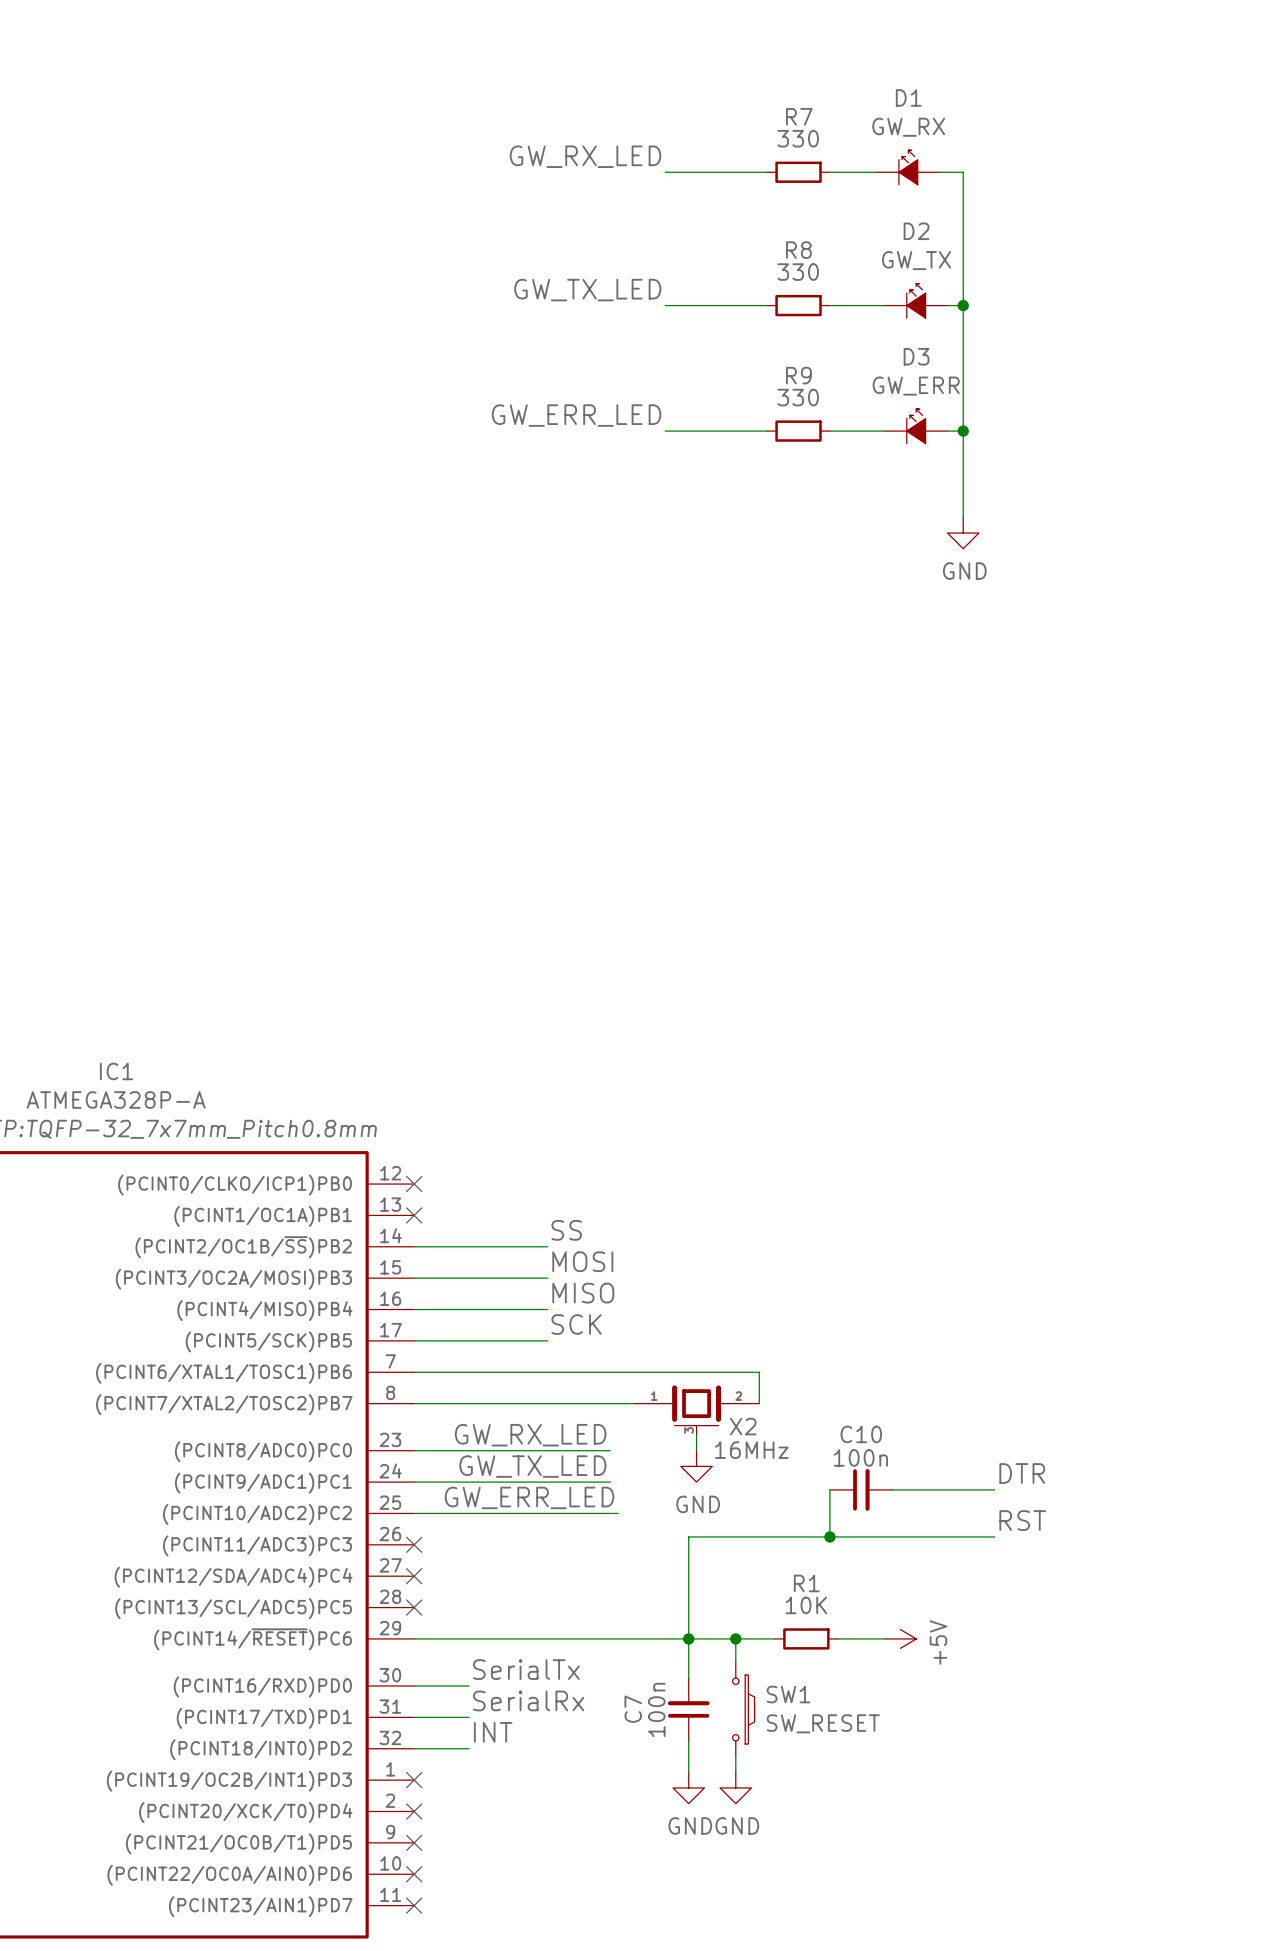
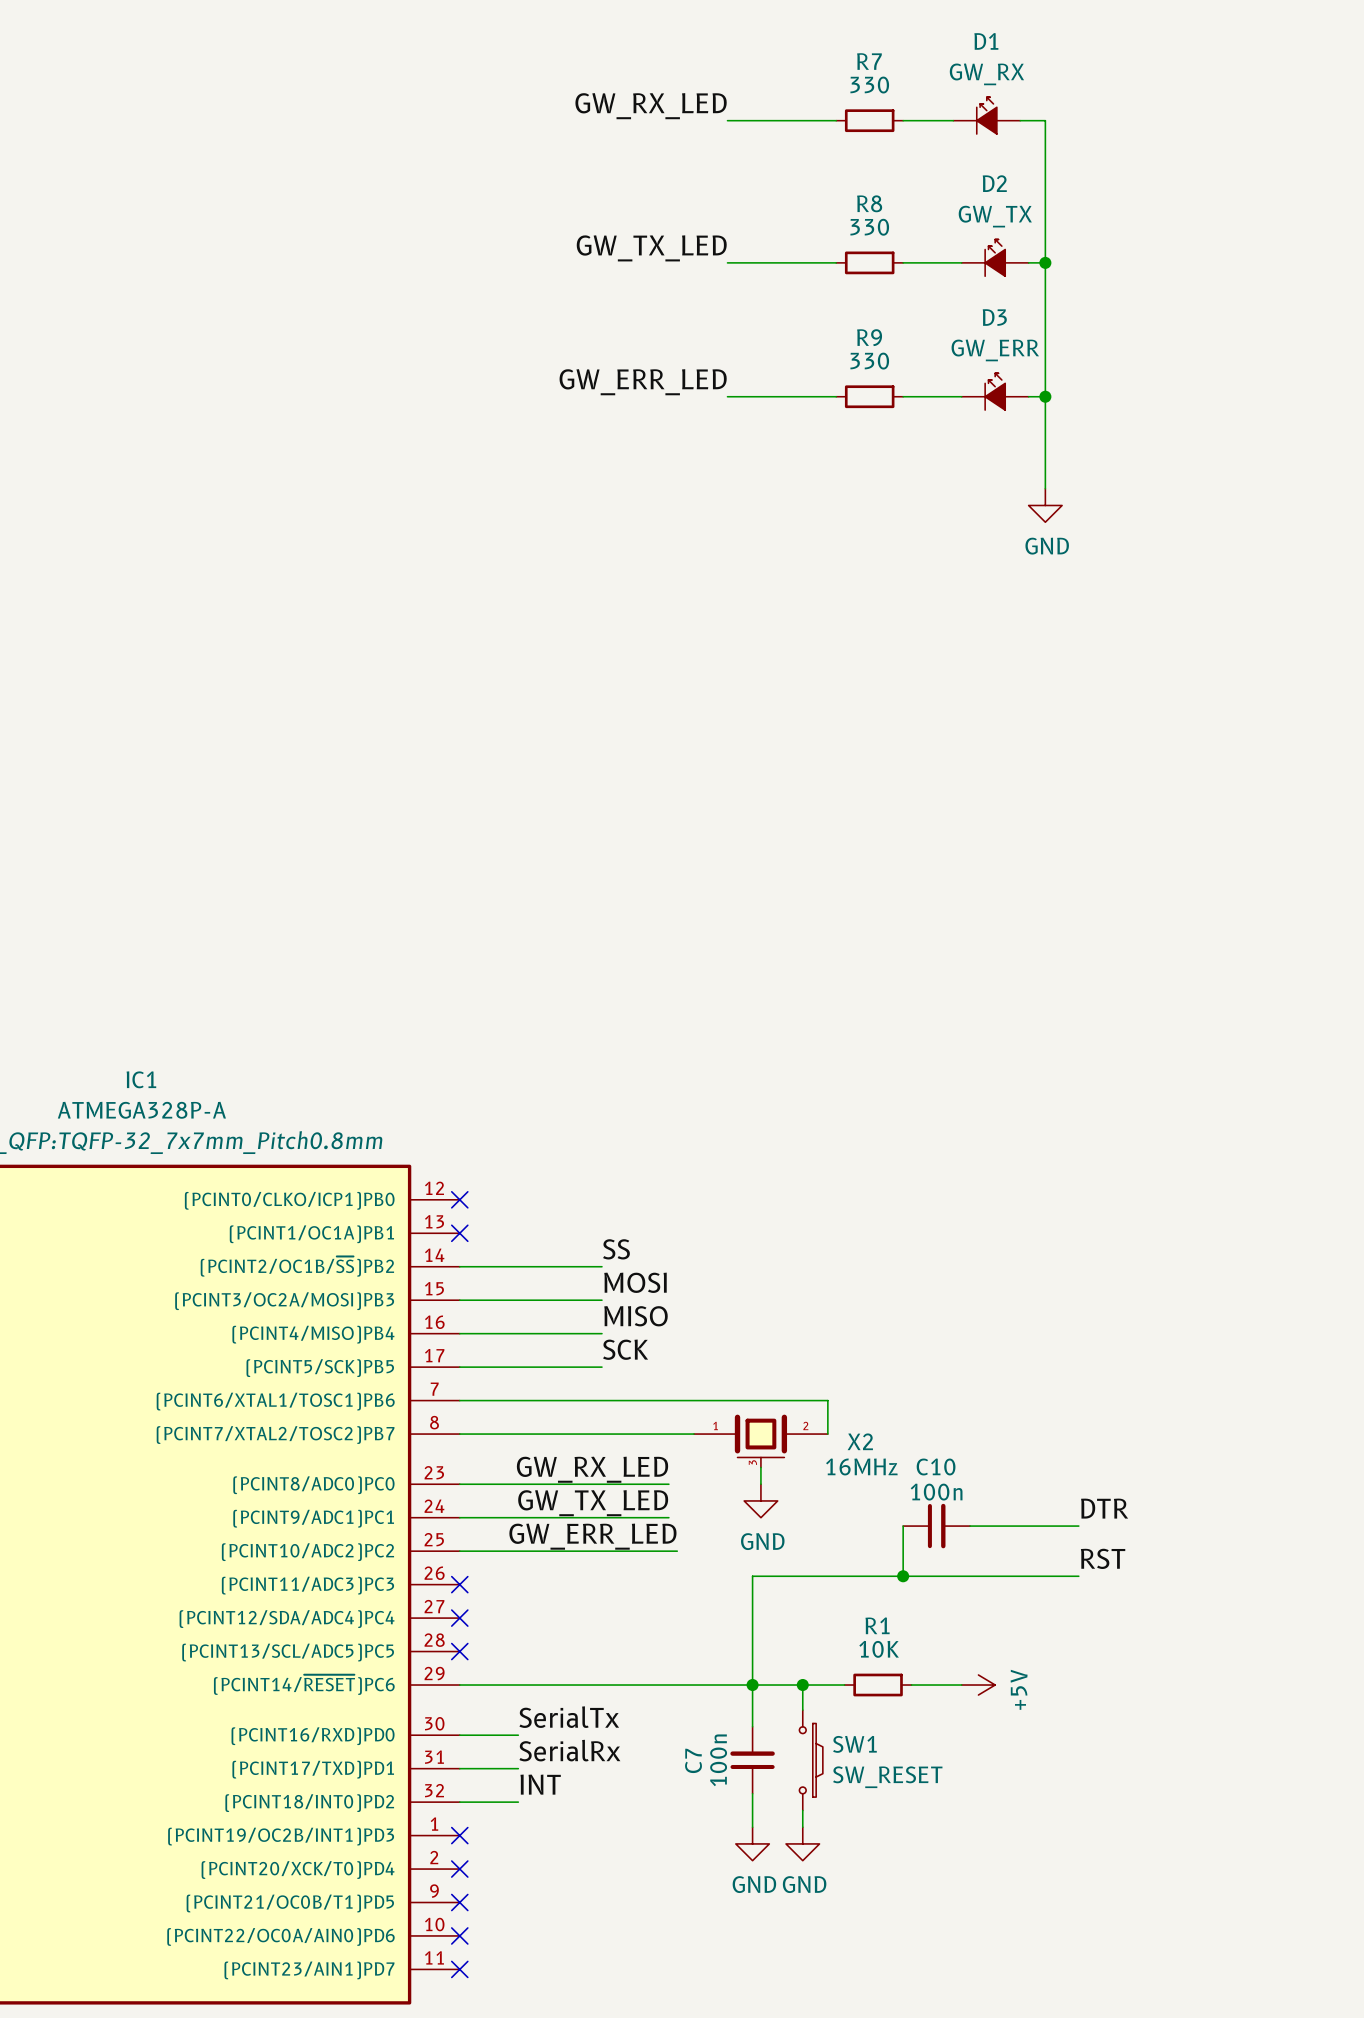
X2 name position: X2 (743, 1426) -> X2 (860, 1441)
X2 value position: 16MHz (751, 1450) -> 16MHz (861, 1466)

